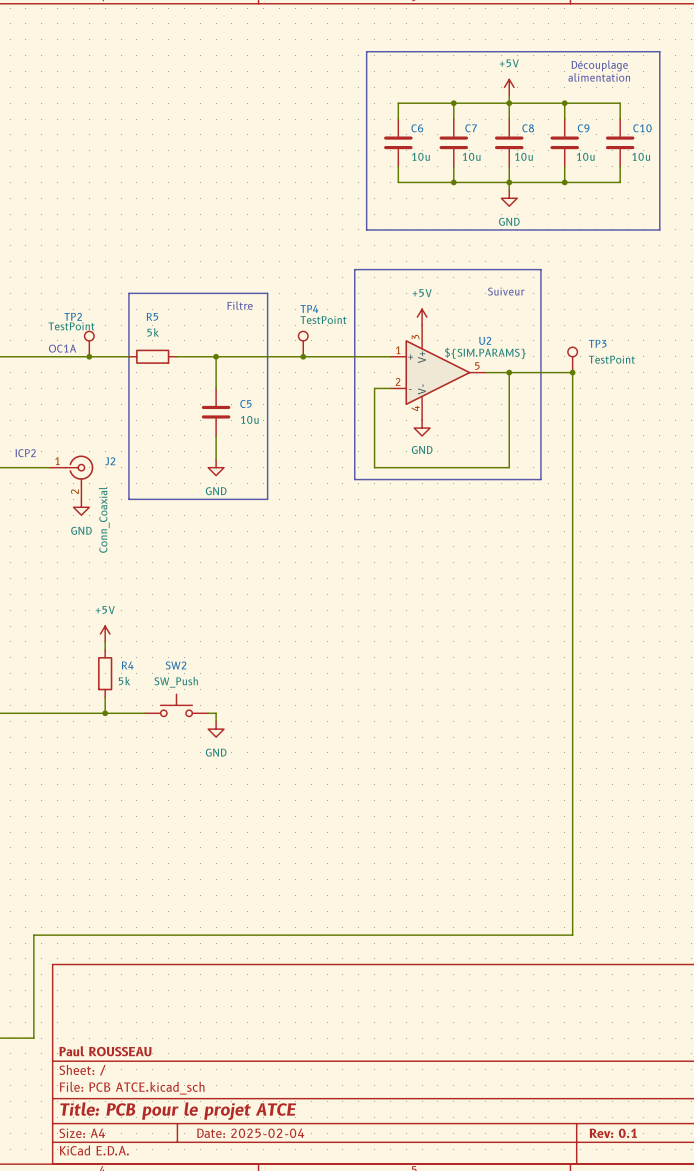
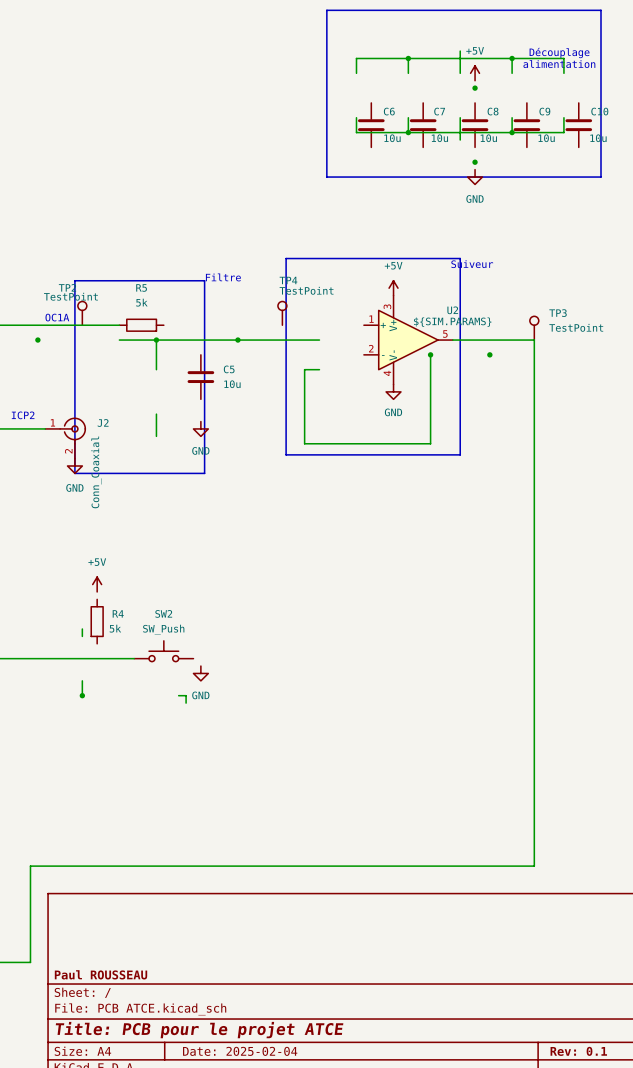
line: (366, 51) (659, 51) (659, 229) (366, 229) (366, 51) -> (326, 10) (601, 10) (601, 177) (326, 177) (326, 10)
junction: none -> (408, 58)
junction: none -> (512, 58)
wire: (509, 95) (509, 119) -> (460, 51) (460, 73)
wire: (453, 103) (453, 119) -> (408, 58) (408, 73)
junction: (453, 103) -> none
wire: (564, 103) (564, 119) -> (512, 58) (512, 73)
junction: (564, 103) -> none
wire: (398, 119) (398, 103) (620, 103) (620, 119) -> (356, 73) (356, 58) (563, 58) (563, 73)
junction: none -> (408, 132)
junction: none -> (512, 132)
wire: (398, 166) (398, 182) (620, 182) (620, 166) -> (356, 117) (356, 132) (563, 132) (563, 117)
wire: (453, 166) (453, 182) -> (408, 117) (408, 132)
wire: (509, 166) (509, 190) -> (460, 117) (460, 139)
wire: (564, 166) (564, 182) -> (512, 117) (512, 132)
junction: (453, 182) -> none
junction: (564, 182) -> none
line: (354, 269) (540, 269) (540, 479) (354, 479) (354, 269) -> (286, 258) (460, 258) (460, 454) (286, 454) (286, 258)
line: (128, 293) (267, 293) (267, 499) (128, 499) (128, 293) -> (74, 280) (204, 280) (204, 473) (74, 473) (74, 280)
junction: (89, 356) -> none
wire: (176, 356) (390, 356) -> (119, 340) (319, 340)
wire: (216, 356) (216, 388) -> (156, 340) (156, 369)
junction: (216, 356) -> none
junction: (303, 356) -> none
junction: none -> (37, 340)
junction: none -> (156, 340)
junction: none -> (237, 340)
wire: (509, 372) (509, 467) (374, 467) (374, 388) (390, 388) -> (430, 354) (430, 443) (304, 443) (304, 369) (319, 369)
junction position: (509, 372) -> (489, 354)
junction: (572, 372) -> none
junction: none -> (430, 354)
wire: (216, 435) (216, 459) -> (156, 414) (156, 436)
wire: (105, 641) (105, 649) -> (82, 629) (82, 636)
wire: (105, 697) (105, 713) -> (82, 680) (82, 695)
junction: (105, 713) -> none
wire: (208, 713) (216, 713) (216, 721) -> (178, 695) (186, 695) (186, 703)
junction: none -> (82, 695)

